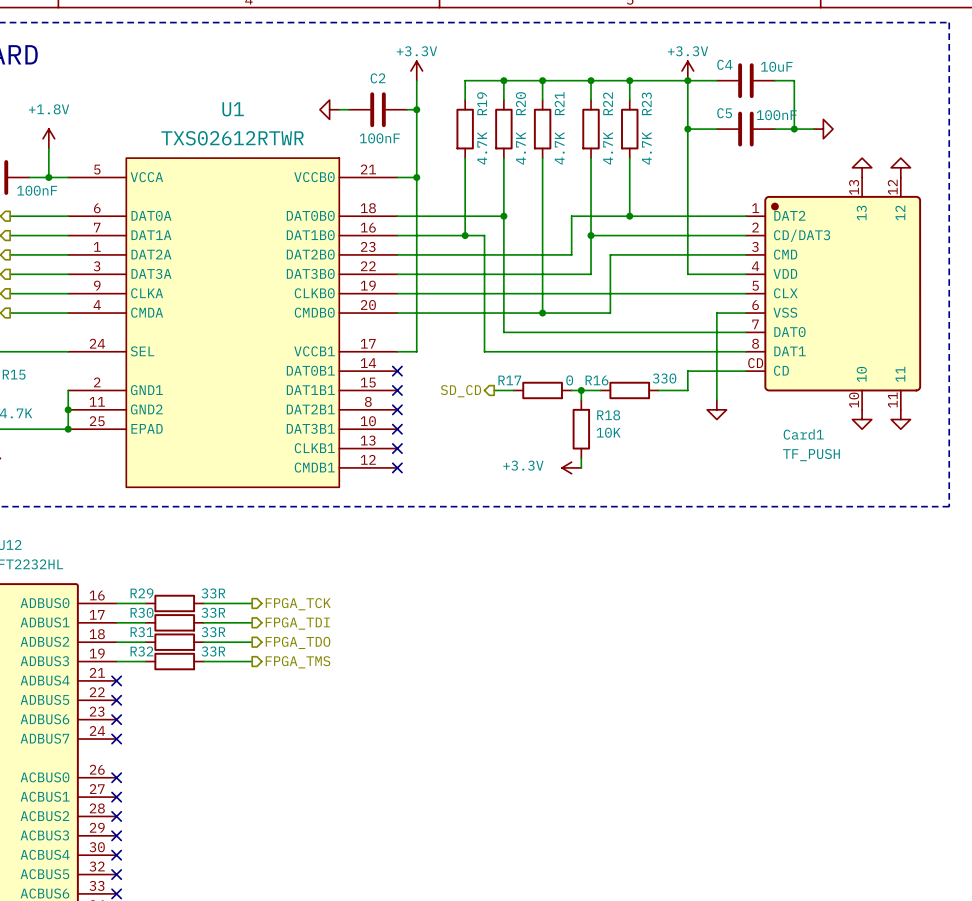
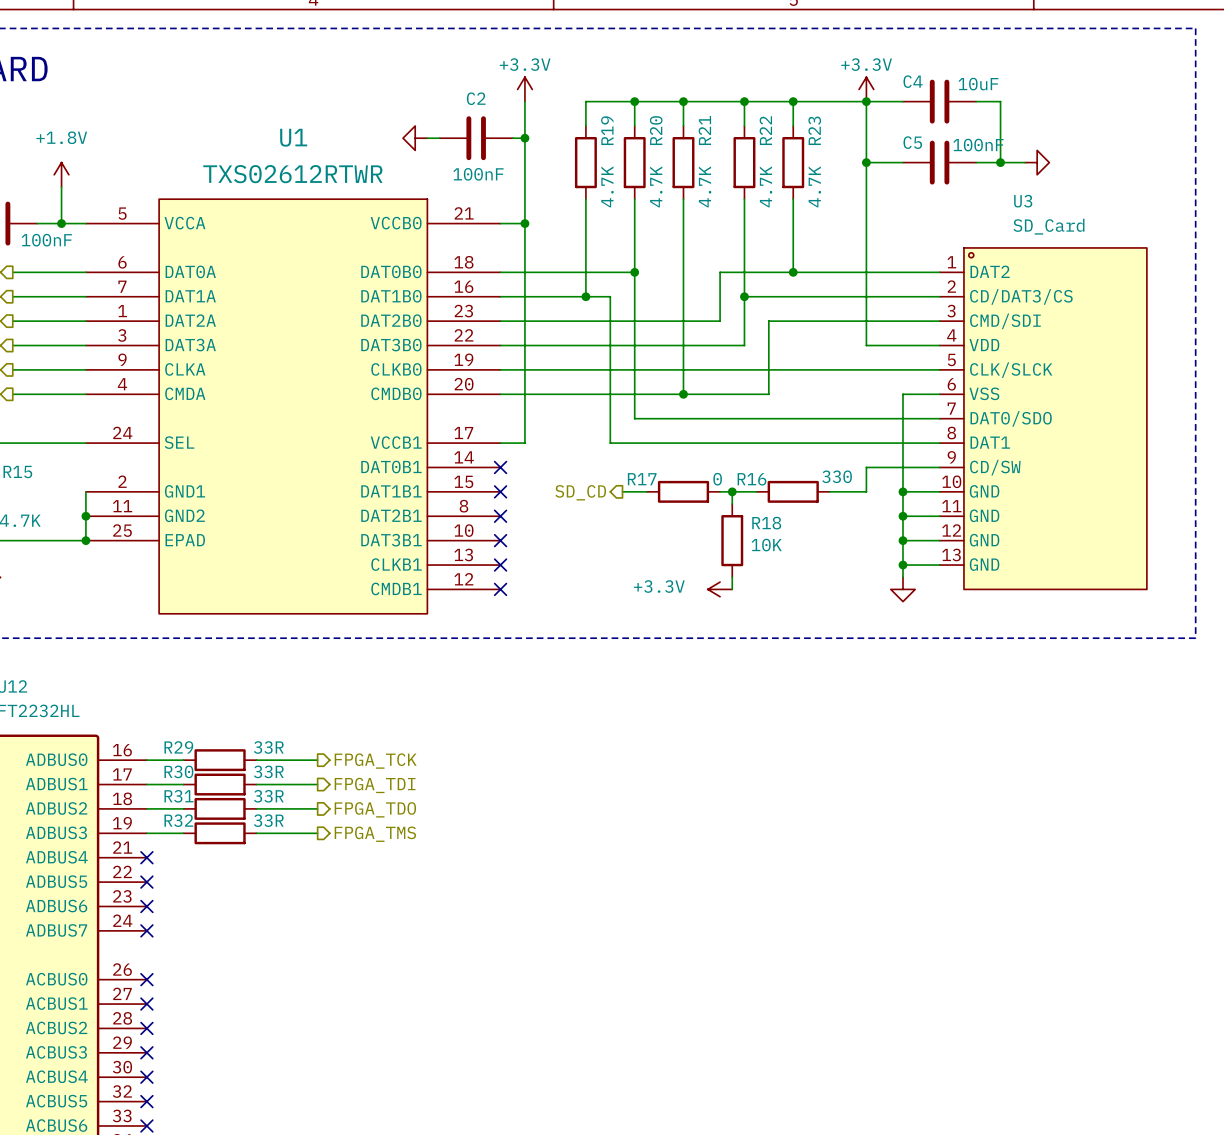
power symbol: (862, 167) -> none
power symbol: (900, 167) -> none
Card1: TF_PUSH (833, 293) -> none
U3: none -> SD_Card (1043, 418)
wire: none -> (902, 491) (939, 491)
junction: none -> (902, 491)
wire: none -> (902, 504) (902, 577)
wire: none -> (902, 516) (939, 516)
power symbol position: (716, 409) -> (902, 589)
junction: none -> (902, 516)
power symbol: (862, 419) -> none
power symbol: (900, 419) -> none
wire: none -> (902, 540) (939, 540)
junction: none -> (902, 540)
wire: none -> (902, 565) (939, 565)
junction: none -> (902, 565)

